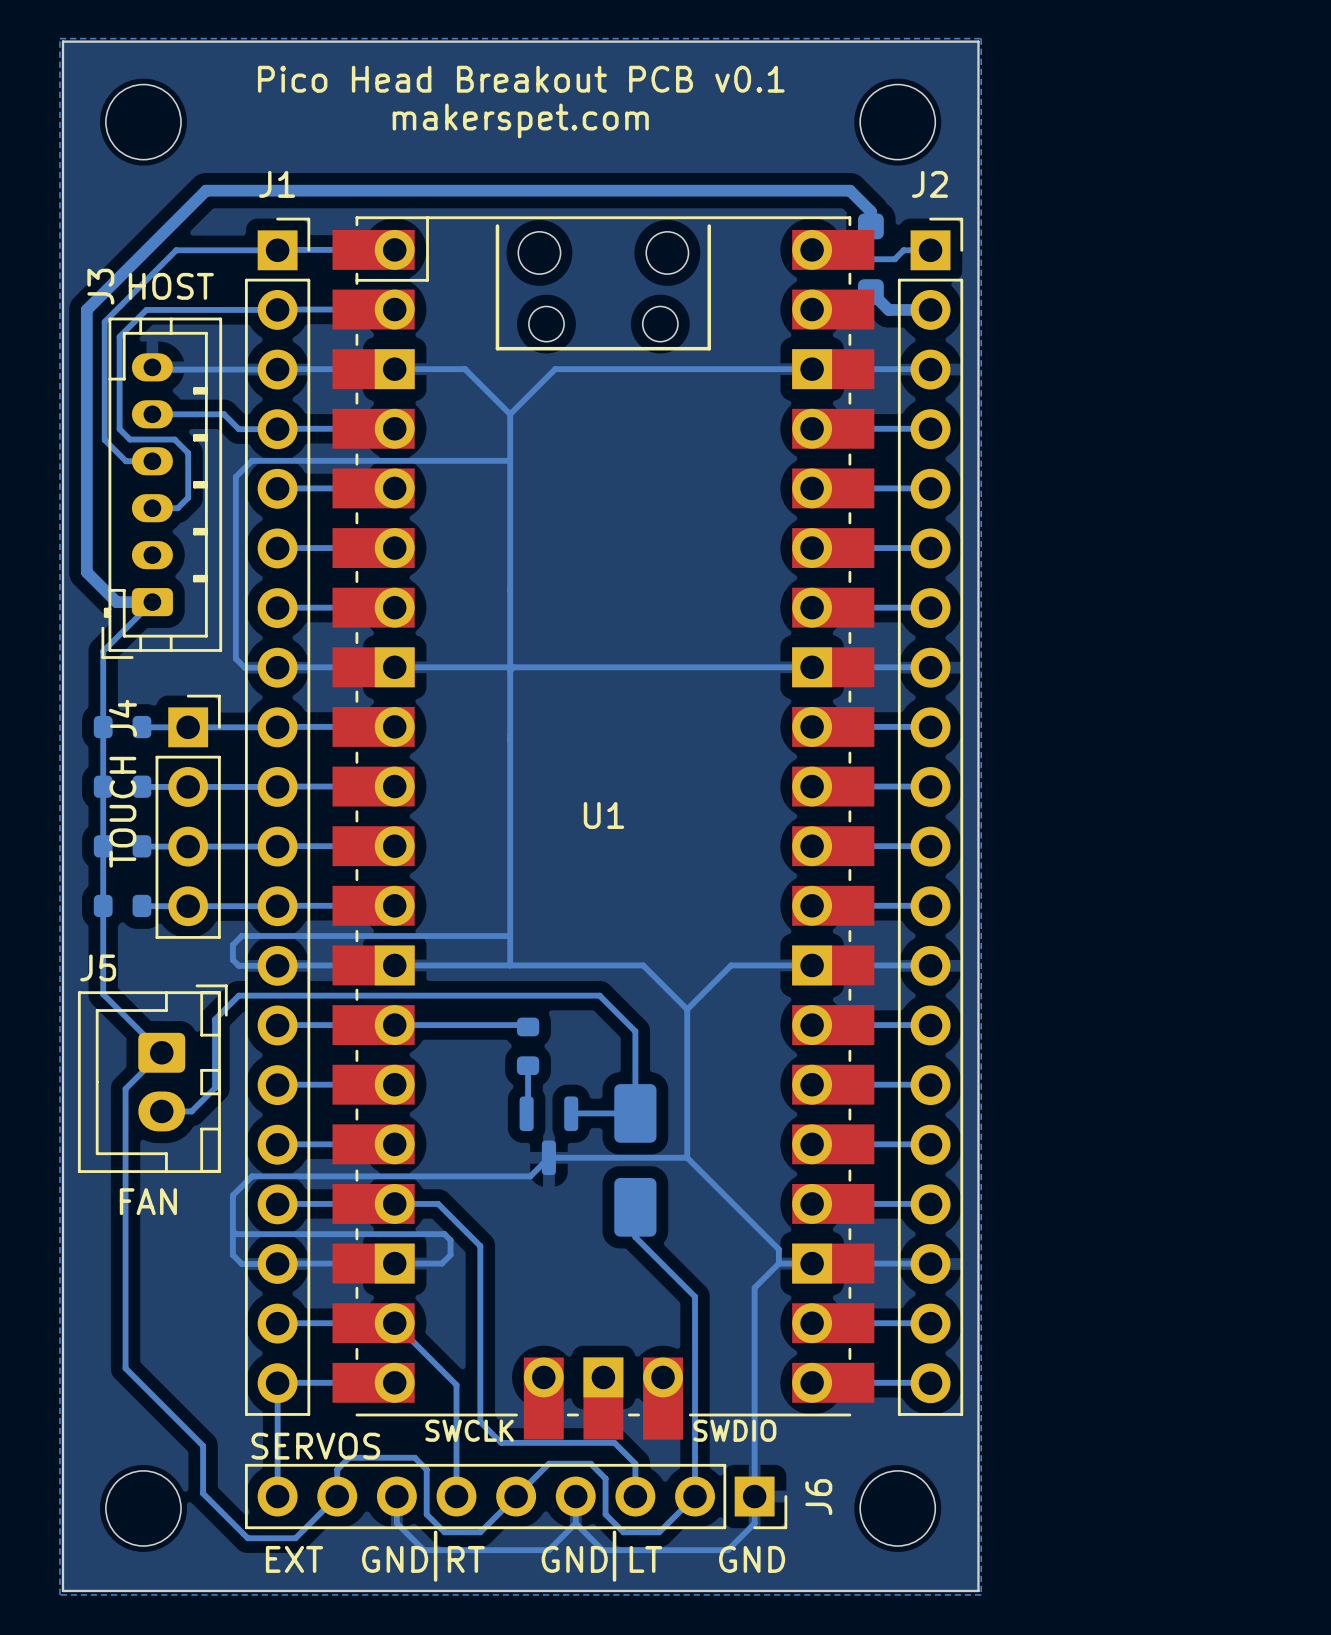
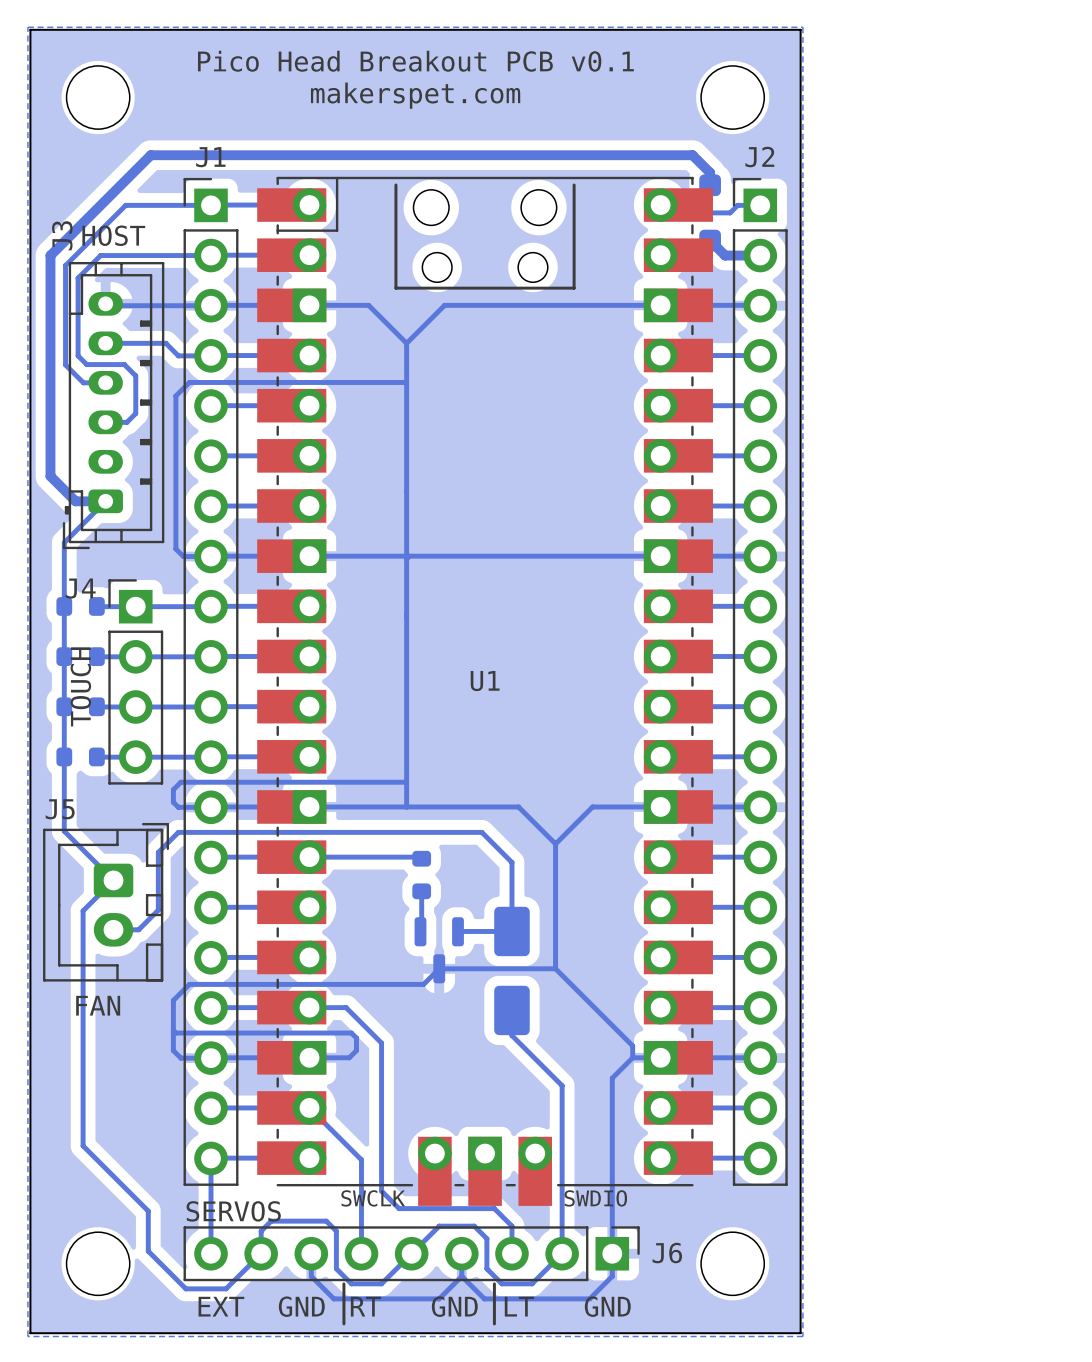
J1 footprint: [244, 217, 311, 1416] -> [183, 177, 239, 1186]
J2 footprint: [897, 217, 964, 1416] -> [732, 177, 788, 1186]
J4 footprint: [155, 694, 221, 939] -> [108, 579, 164, 785]
J6 footprint: [244, 1463, 788, 1530] -> [183, 1226, 640, 1282]

